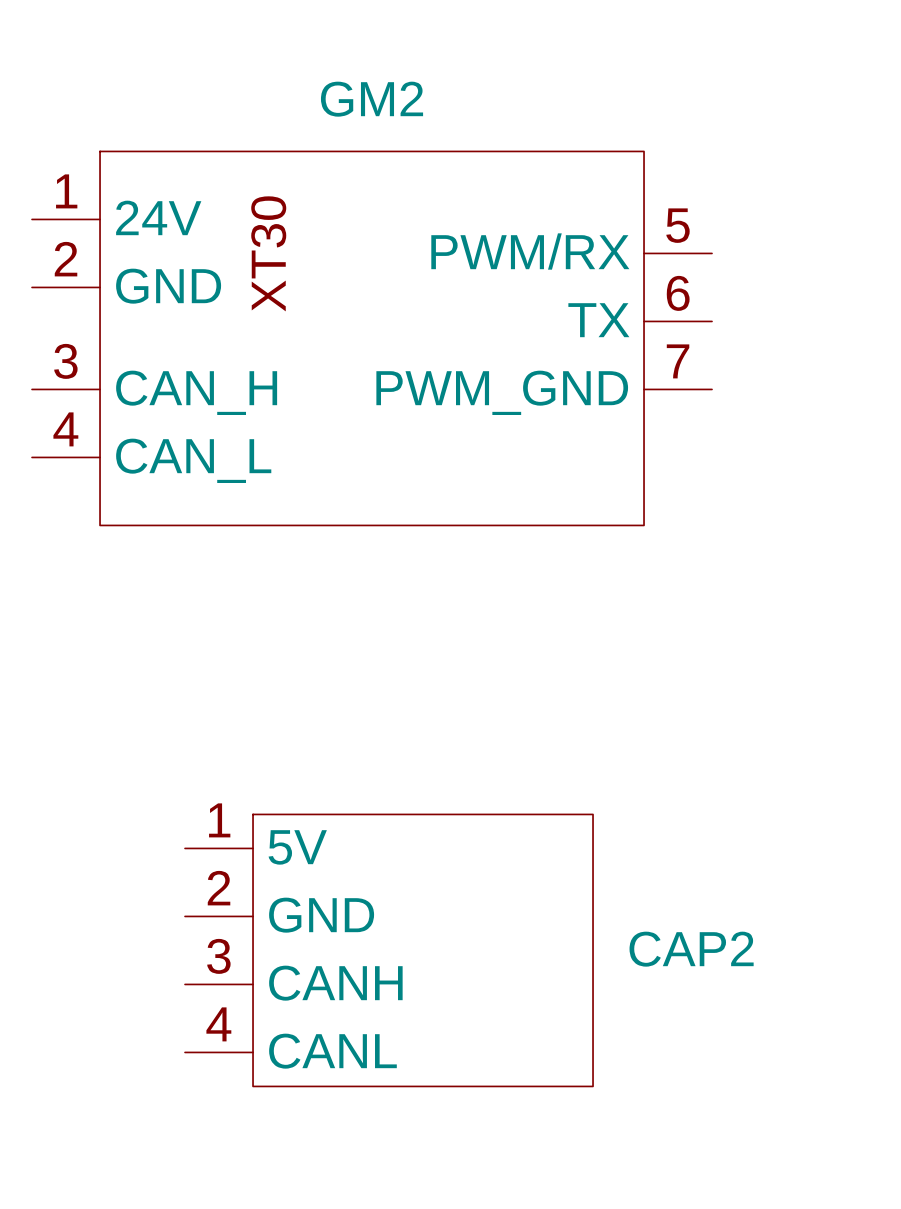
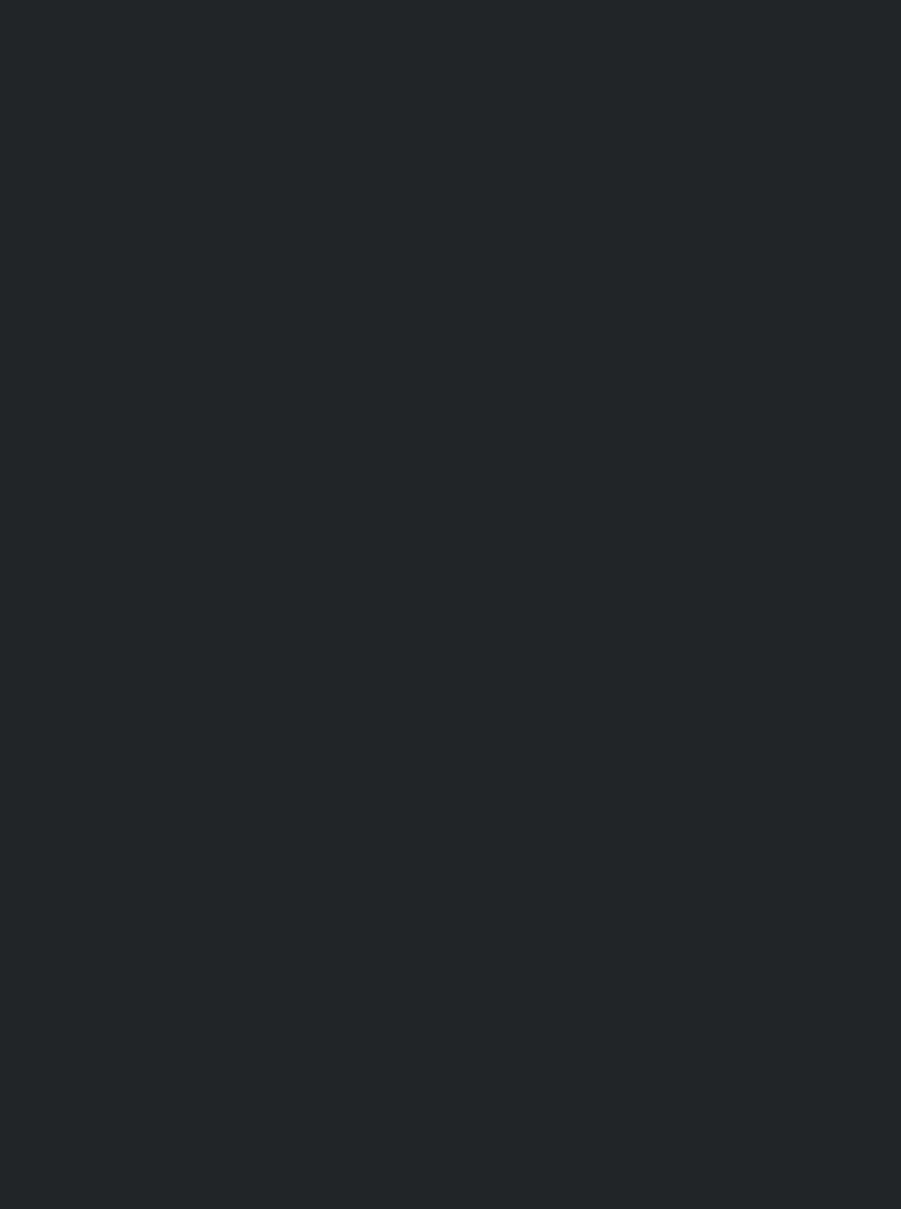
GM2: (372, 338) -> none
CAP2: (389, 950) -> none

